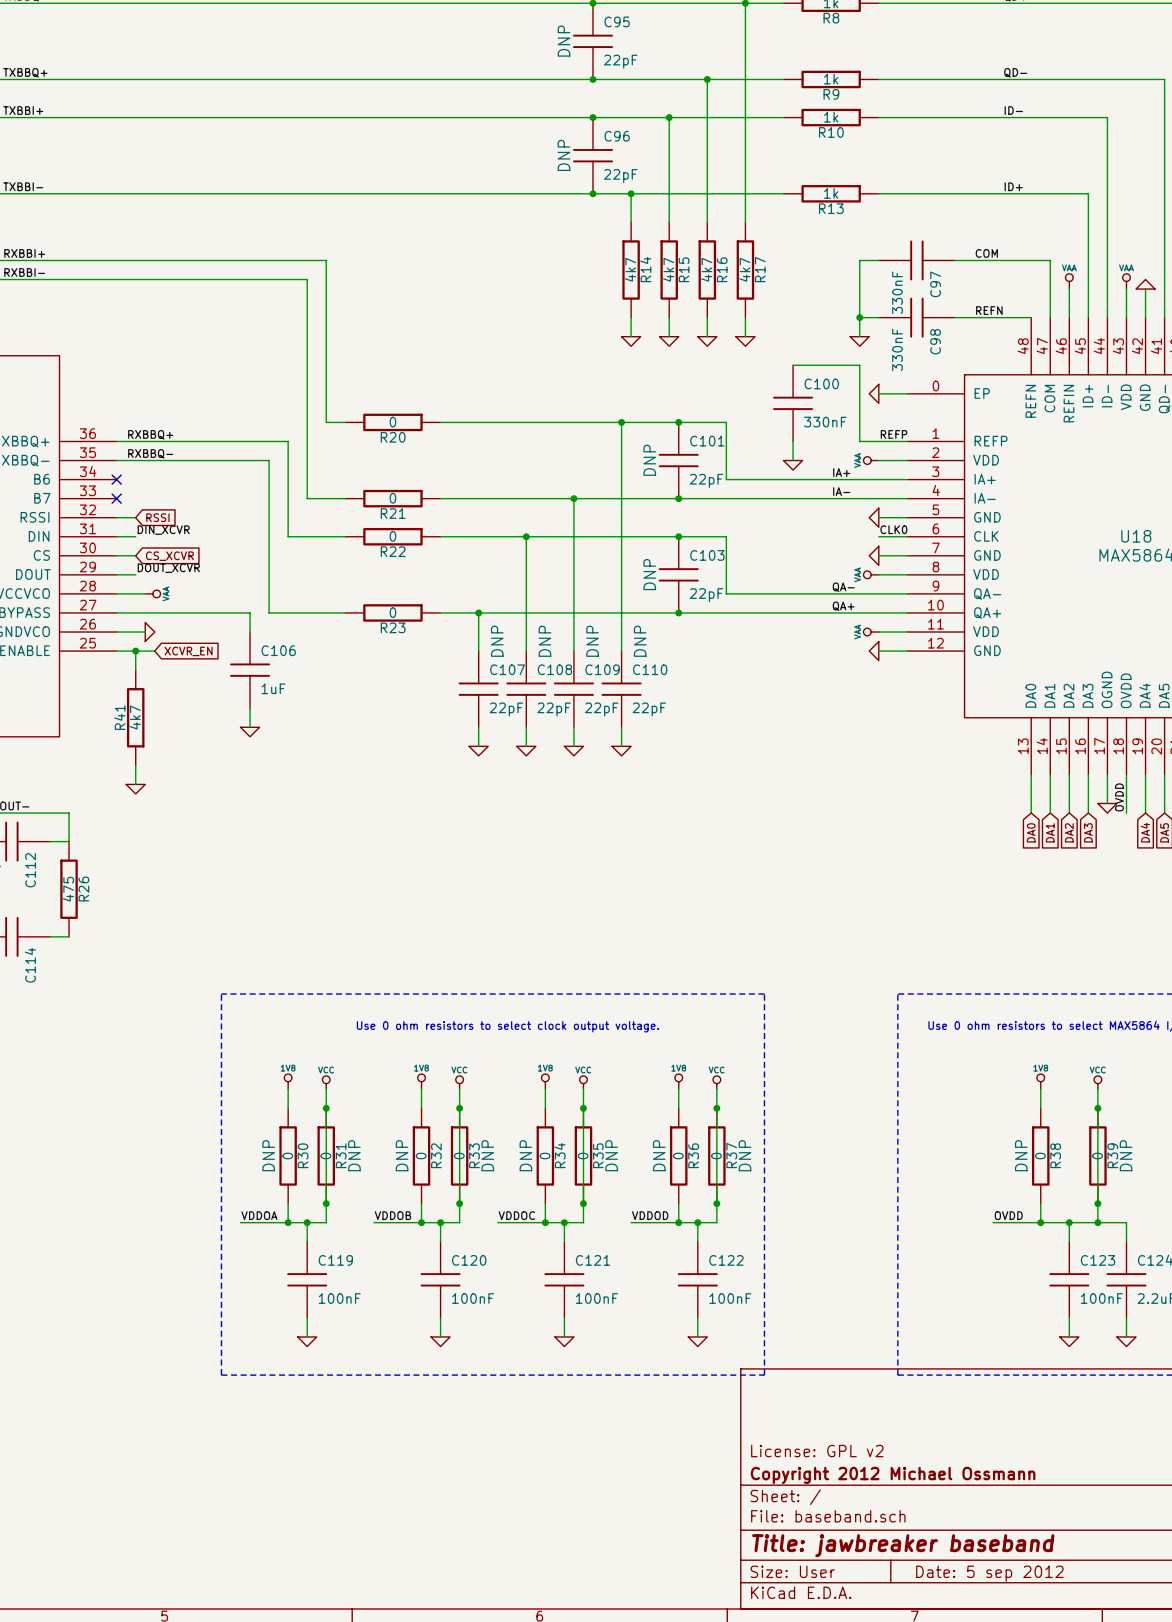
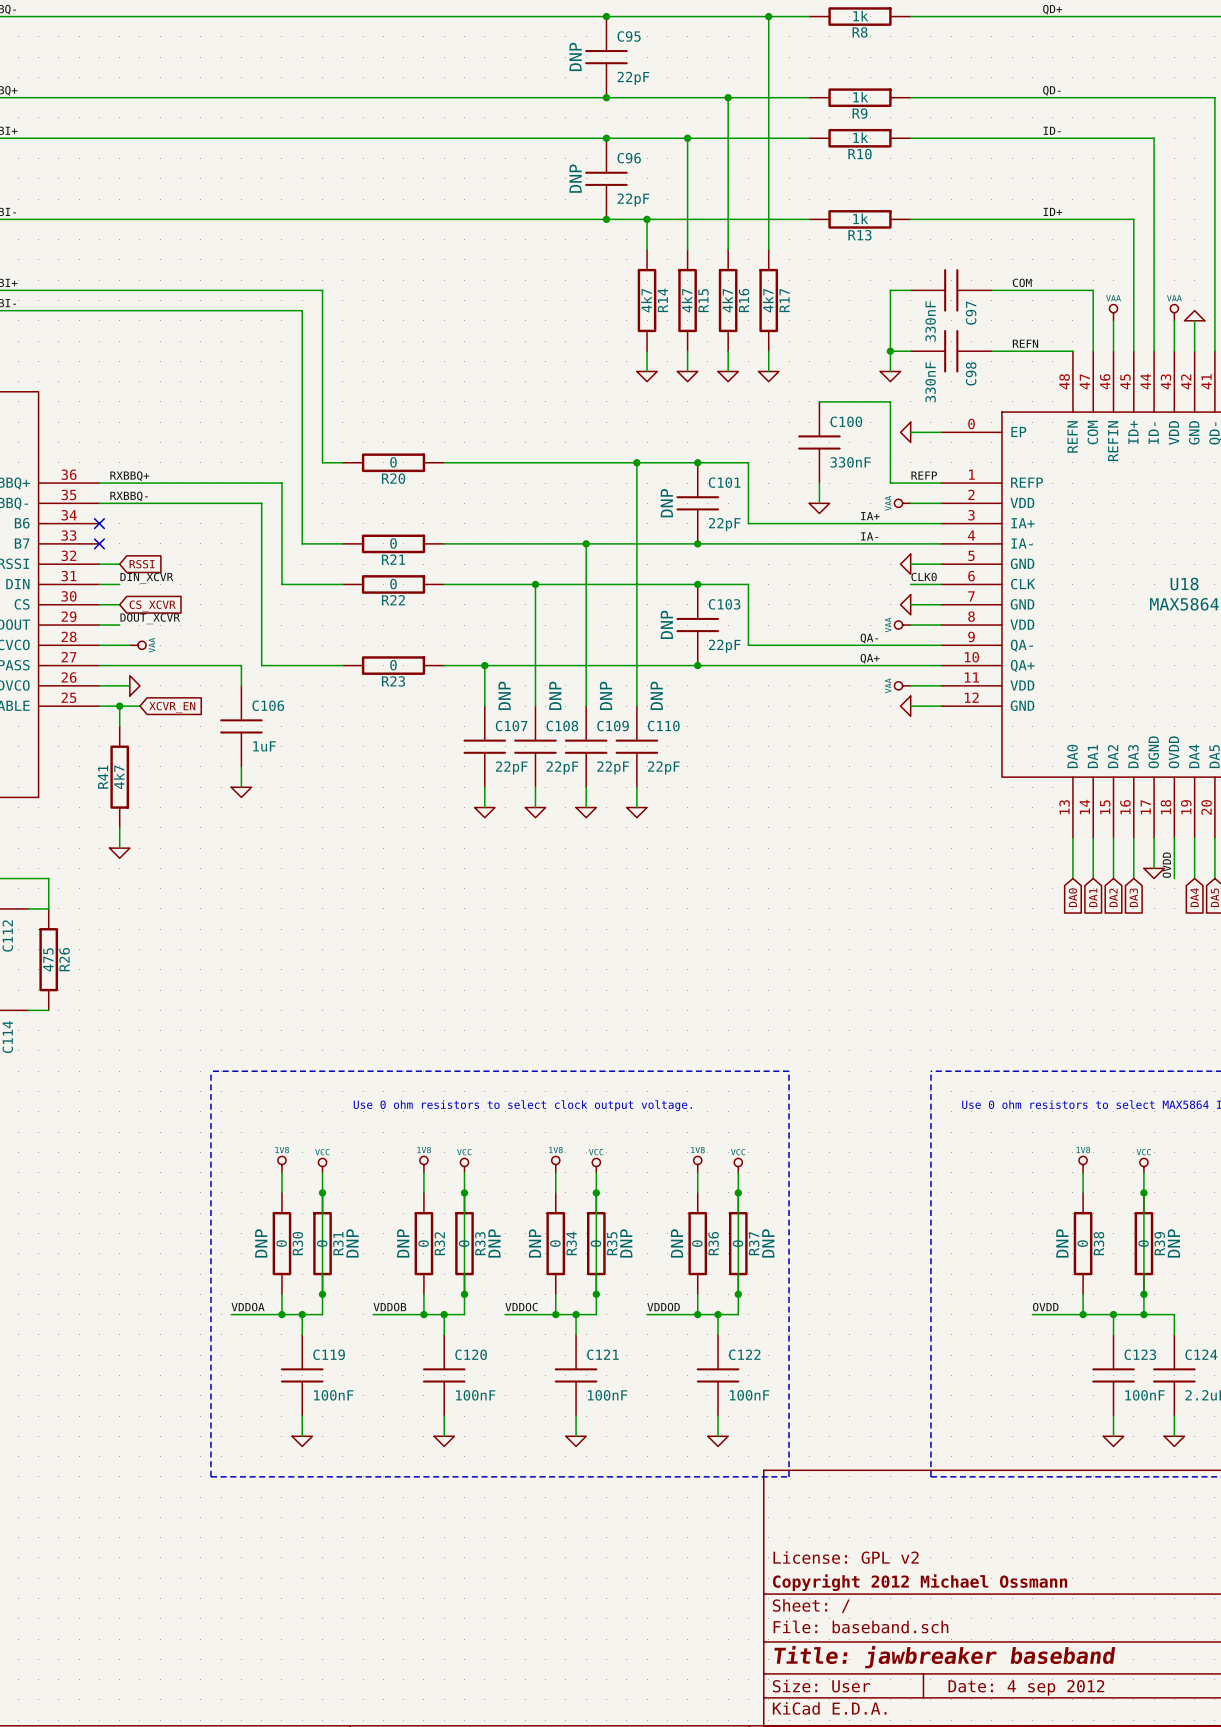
title block: Date: 5 sep 2012 (989, 1573) -> Date: 4 sep 2012 (1026, 1687)

